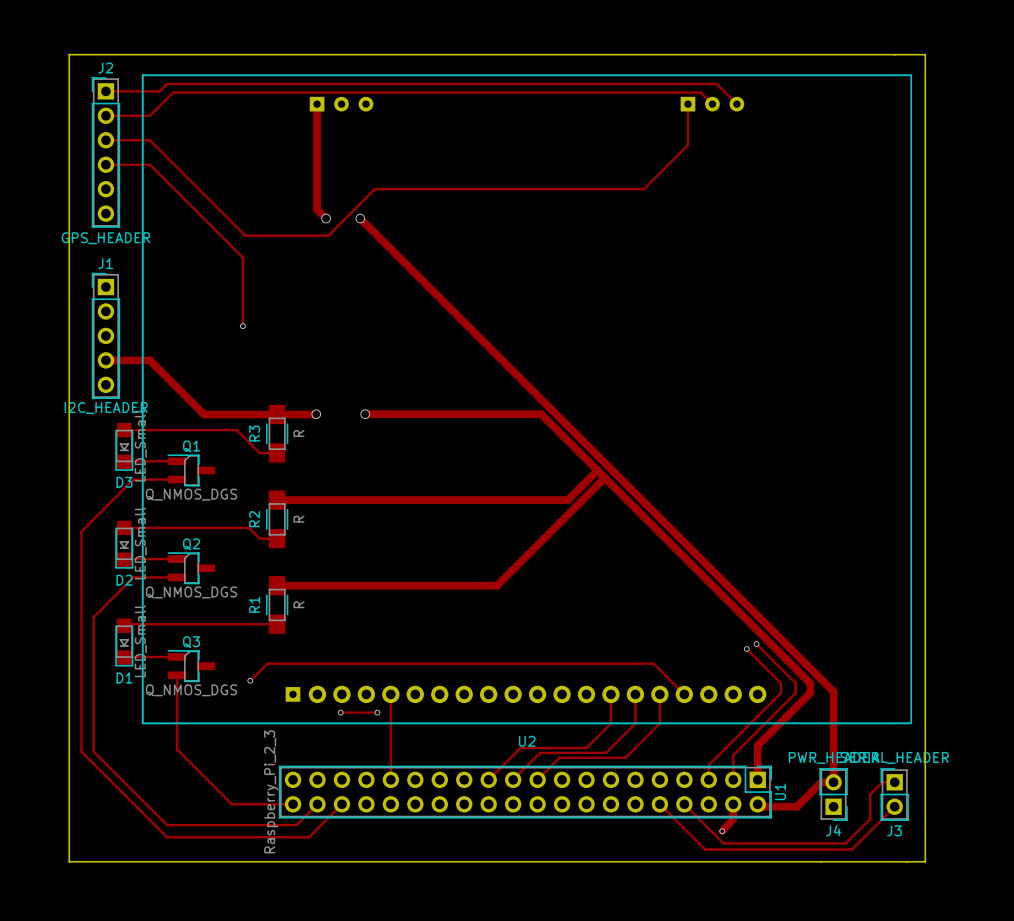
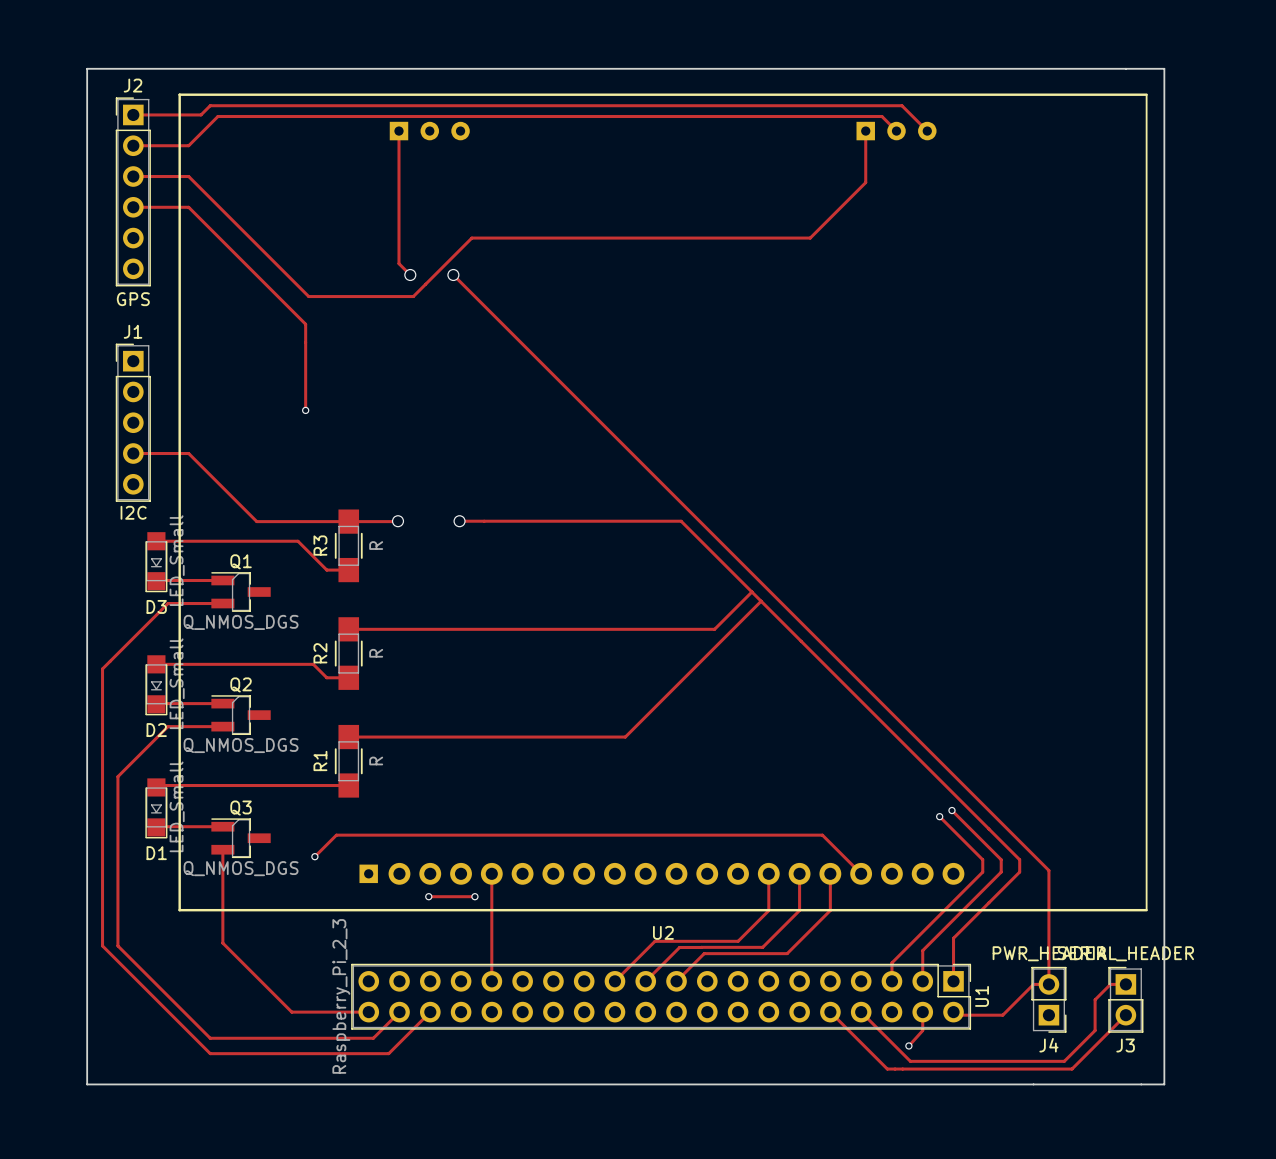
track width: thick (317, 104) (317, 209) (326, 218) -> thin (398, 131) (398, 263) (410, 275)
track width: thick (360, 218) (833, 691) (833, 782) (821, 782) (796, 806) (760, 806) -> thin (453, 275) (1048, 870) (1048, 984) (1033, 984) (1002, 1015) (956, 1015)
J2 value: GPS_HEADER (105, 238) -> GPS (133, 299)
track width: thick (105, 360) (149, 360) (204, 414) (316, 414) -> thin (133, 453) (188, 453) (256, 521) (398, 521)
J1 value: I2C_HEADER (106, 407) -> I2C (133, 512)
track width: thick (365, 414) (541, 414) (810, 683) (810, 693) (757, 745) (757, 779) -> thin (459, 521) (681, 521) (1019, 859) (1019, 872) (953, 938) (953, 981)
track width: thick (597, 470) (567, 500) (277, 500) -> thin (751, 592) (714, 629) (348, 629)
track width: thick (604, 477) (496, 585) (277, 585) -> thin (761, 601) (625, 737) (348, 737)
track width: thick (733, 804) (733, 818) (722, 831) -> thin (922, 1012) (922, 1030) (908, 1045)

